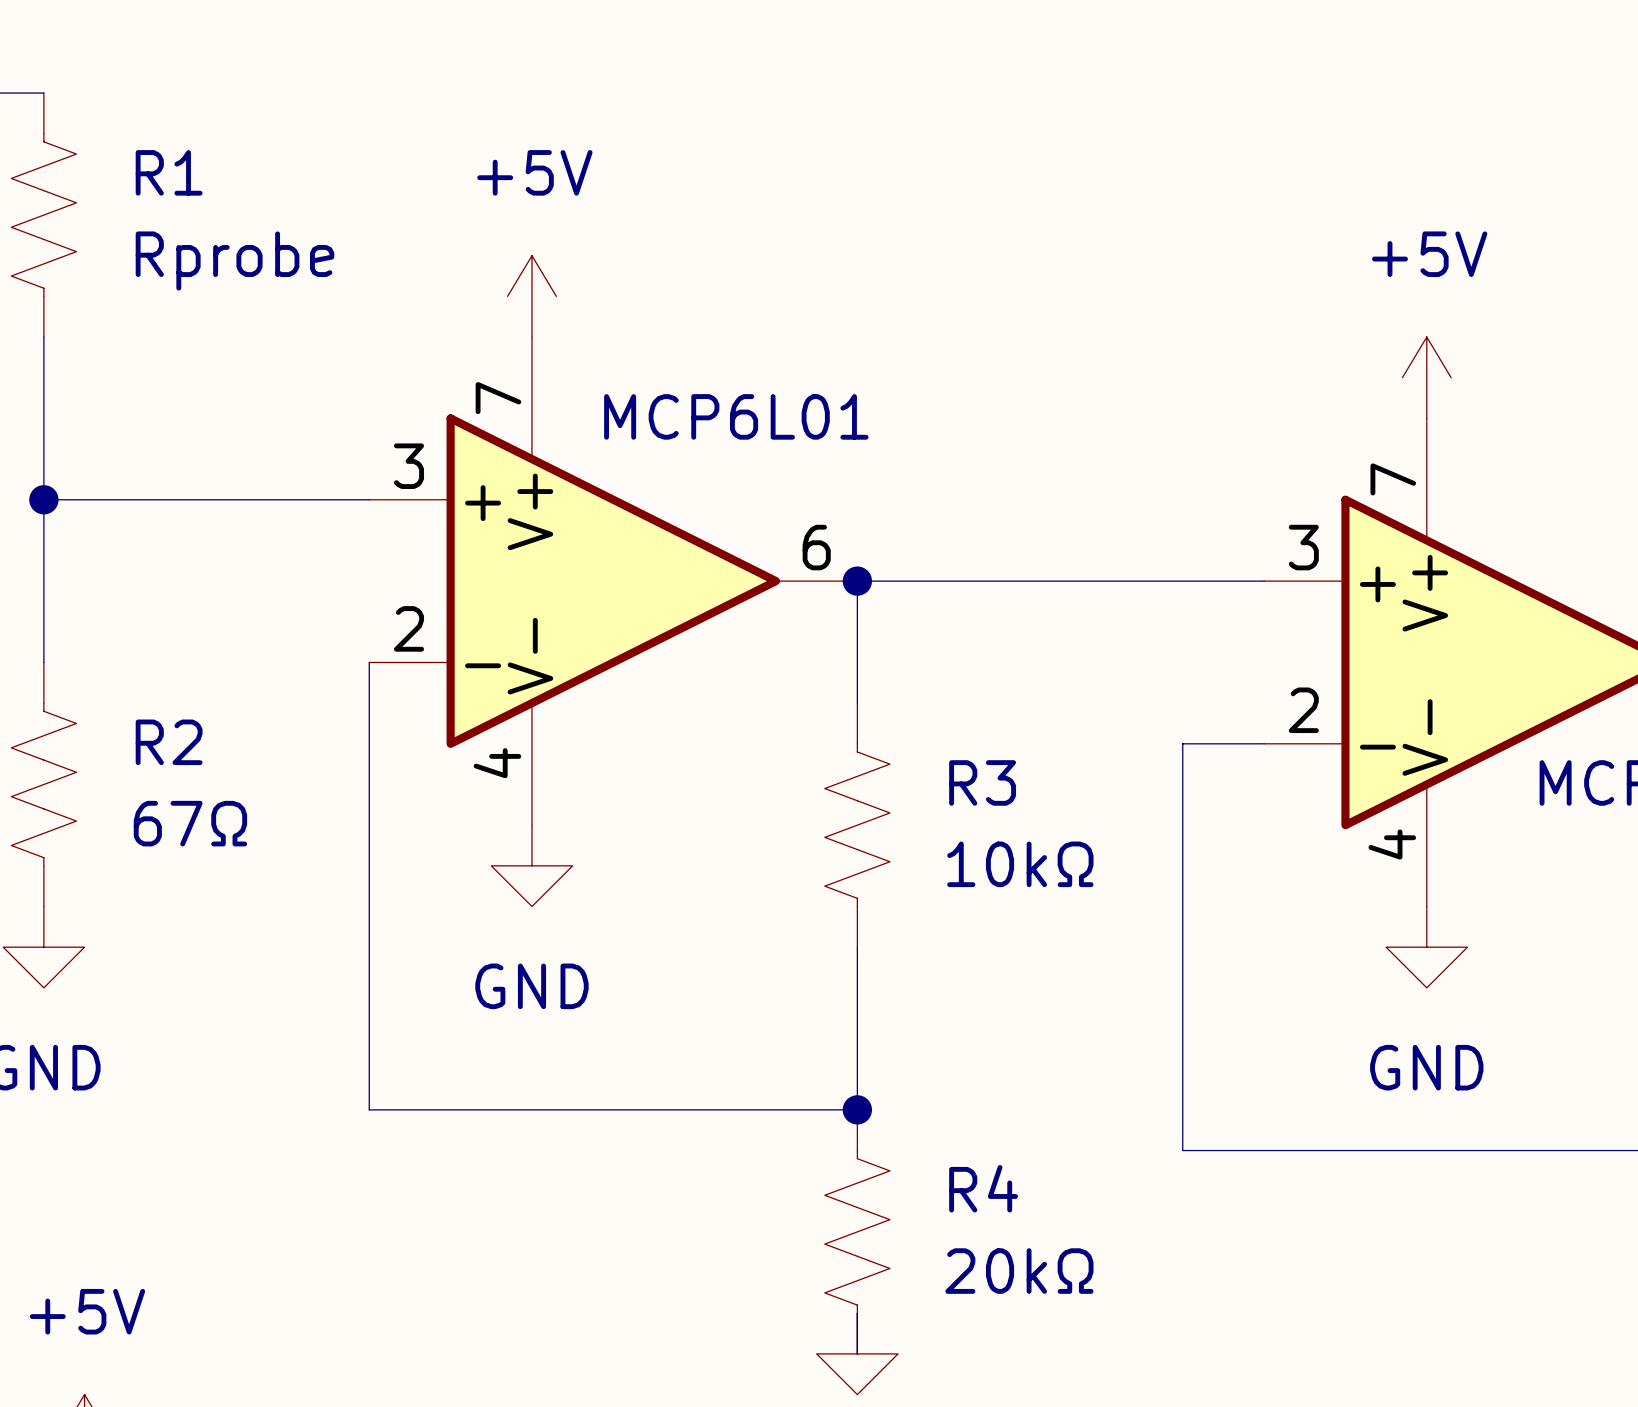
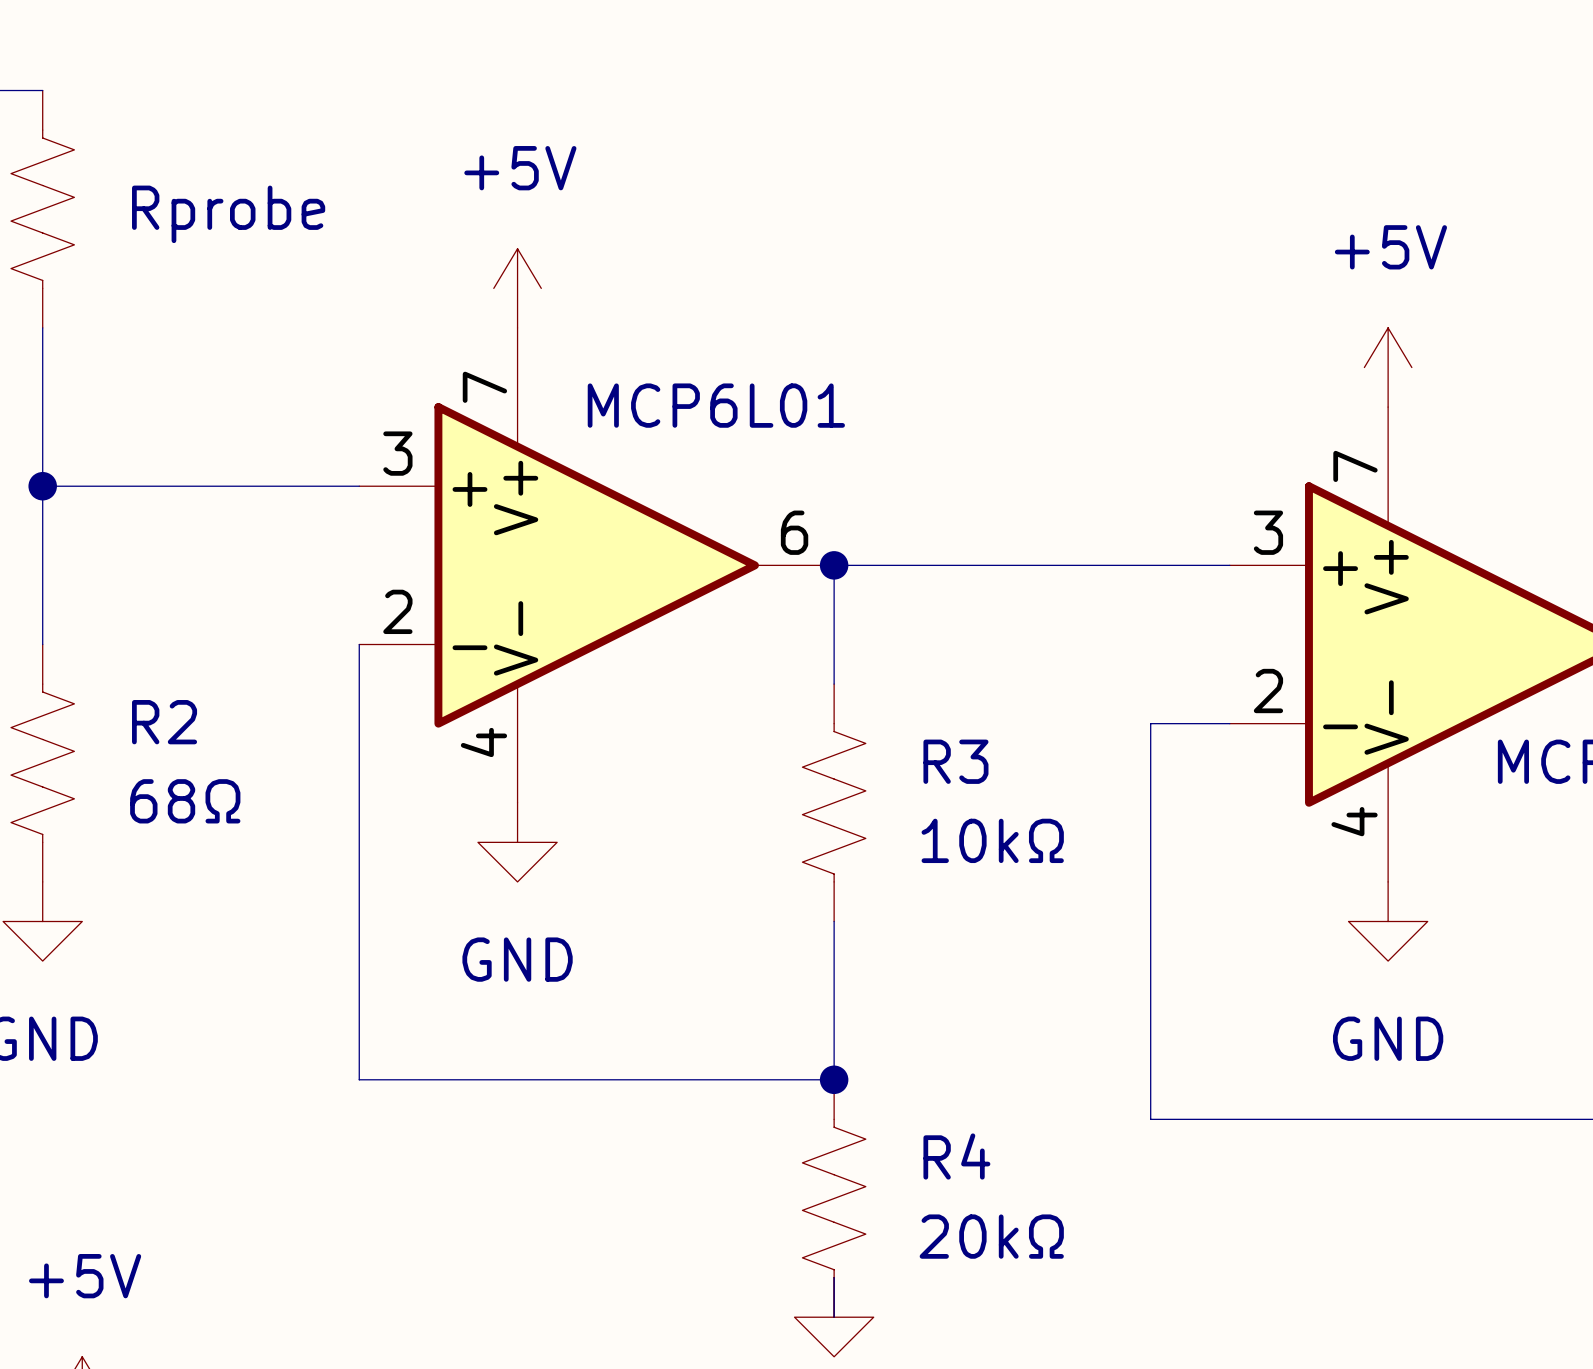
R1 name: R1 (169, 172) -> none
R1 value position: Rprobe (234, 260) -> Rprobe (228, 214)
R2 value: 67Ω (190, 823) -> 68Ω (185, 801)

